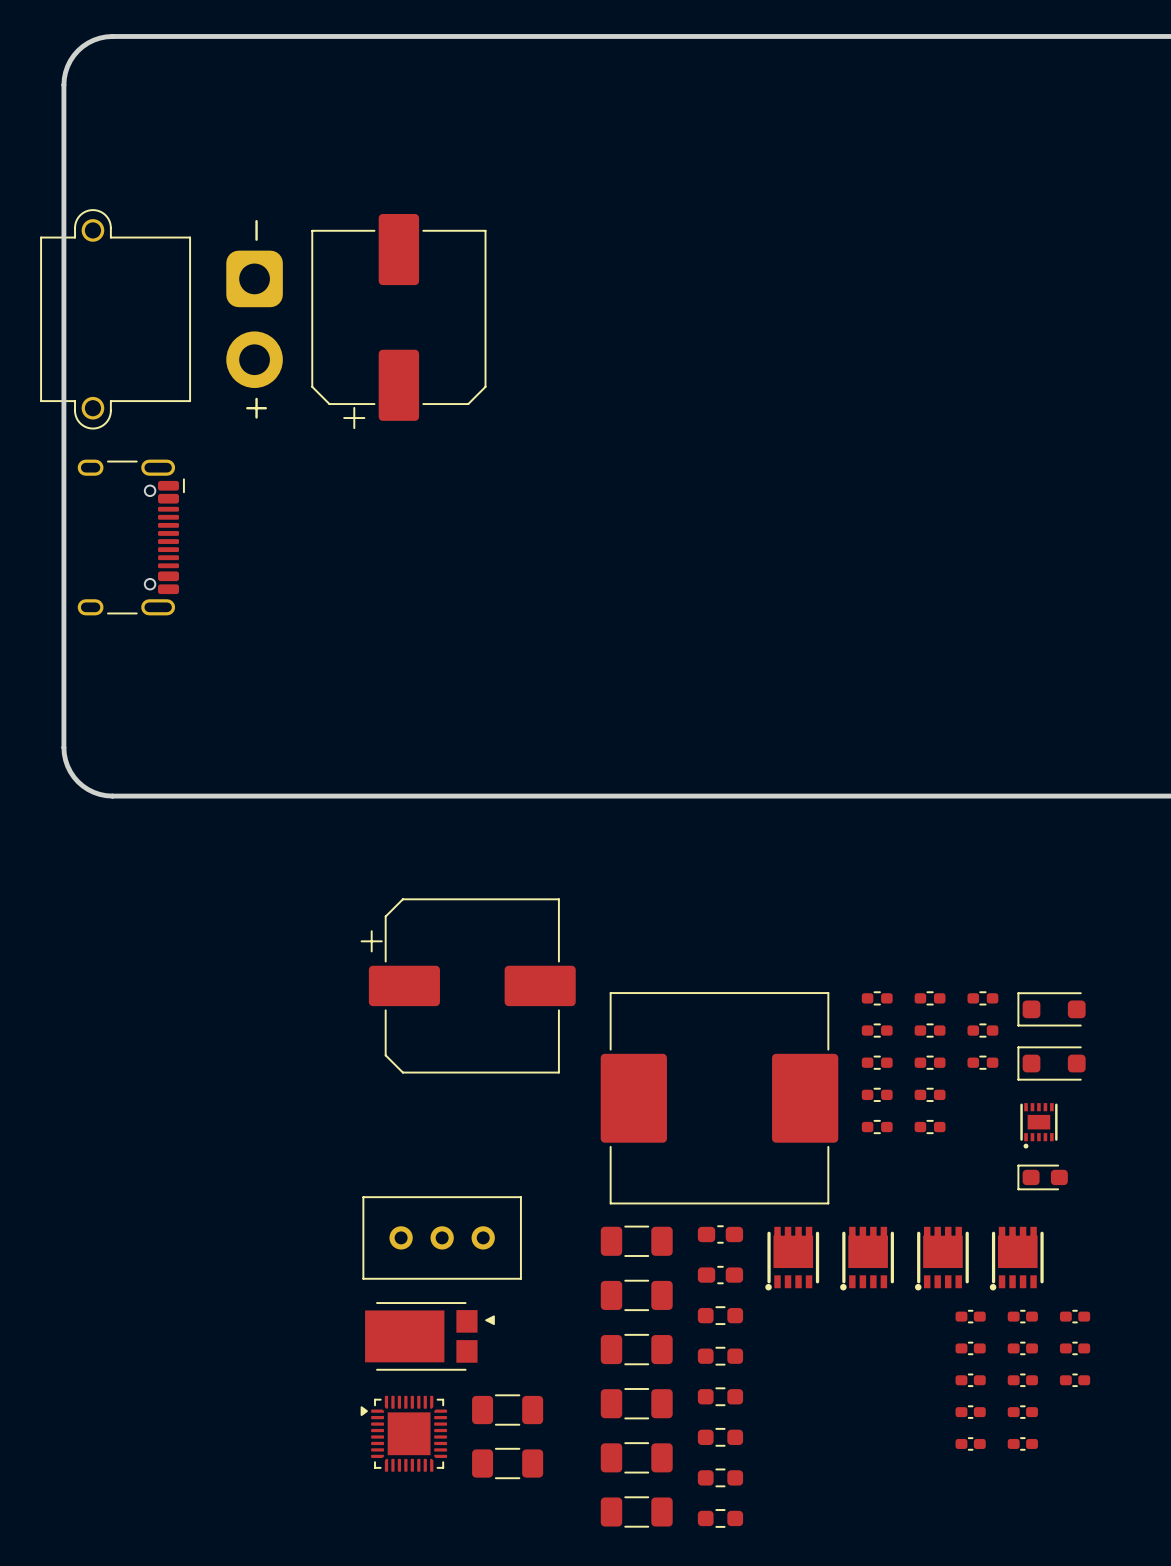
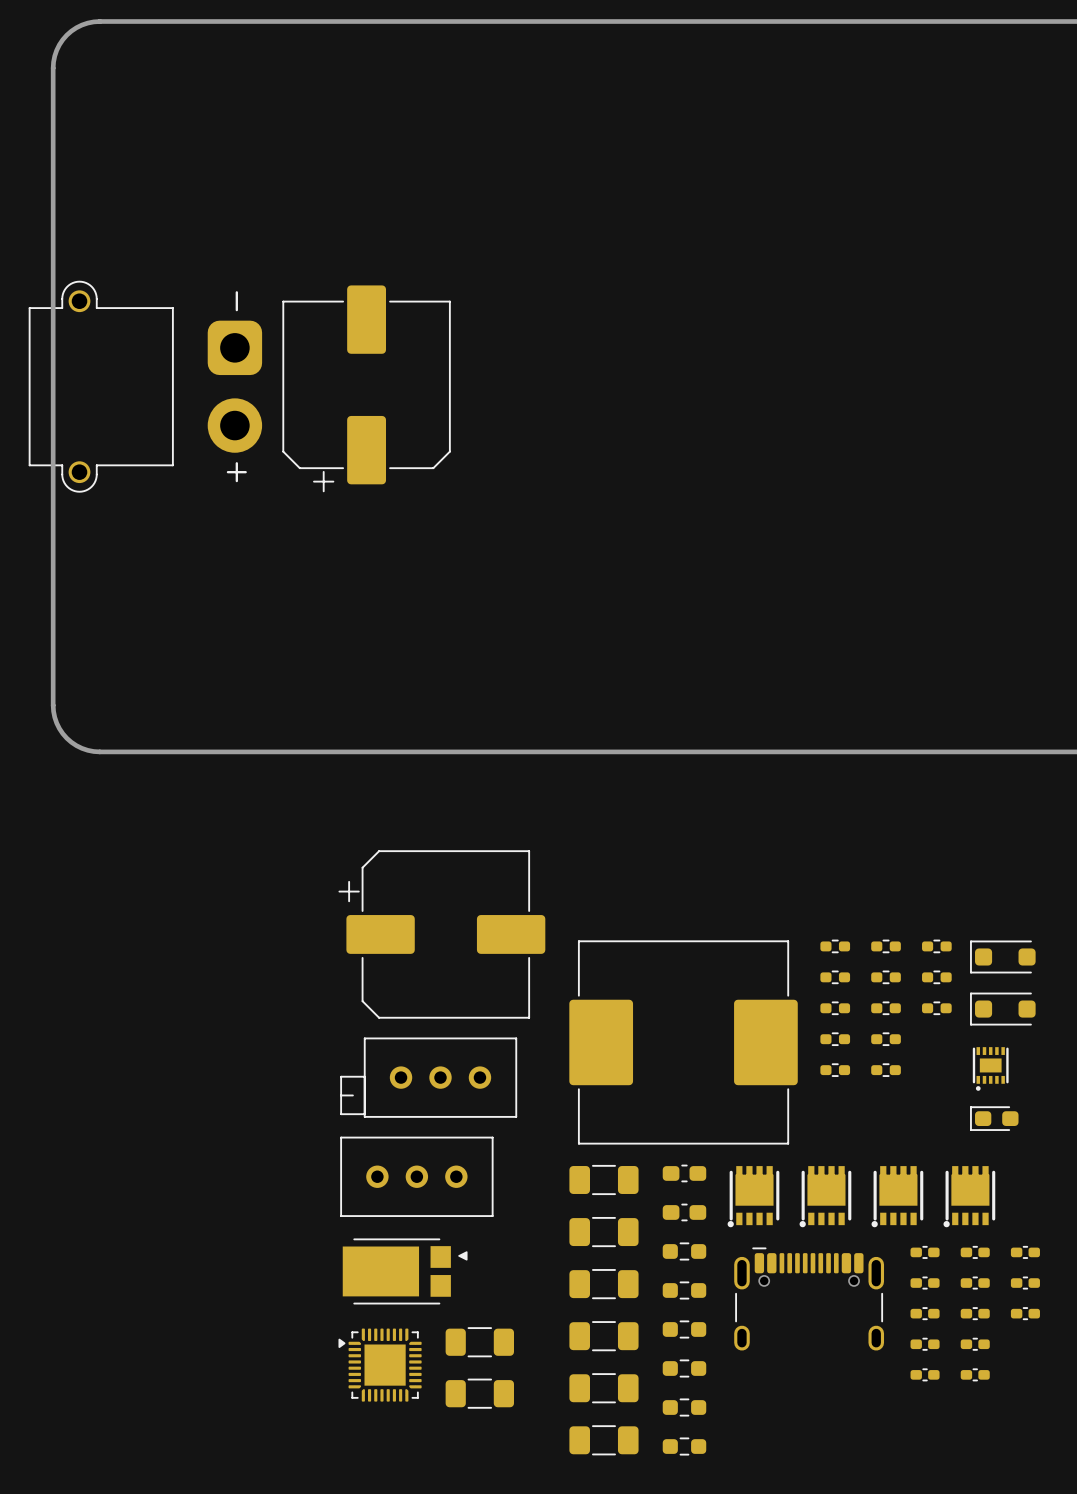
part position: (161, 319) -> (145, 386)
part position: (398, 321) -> (366, 388)
part: (131, 537) -> none
part: none -> (428, 1077)
part: none -> (809, 1298)

